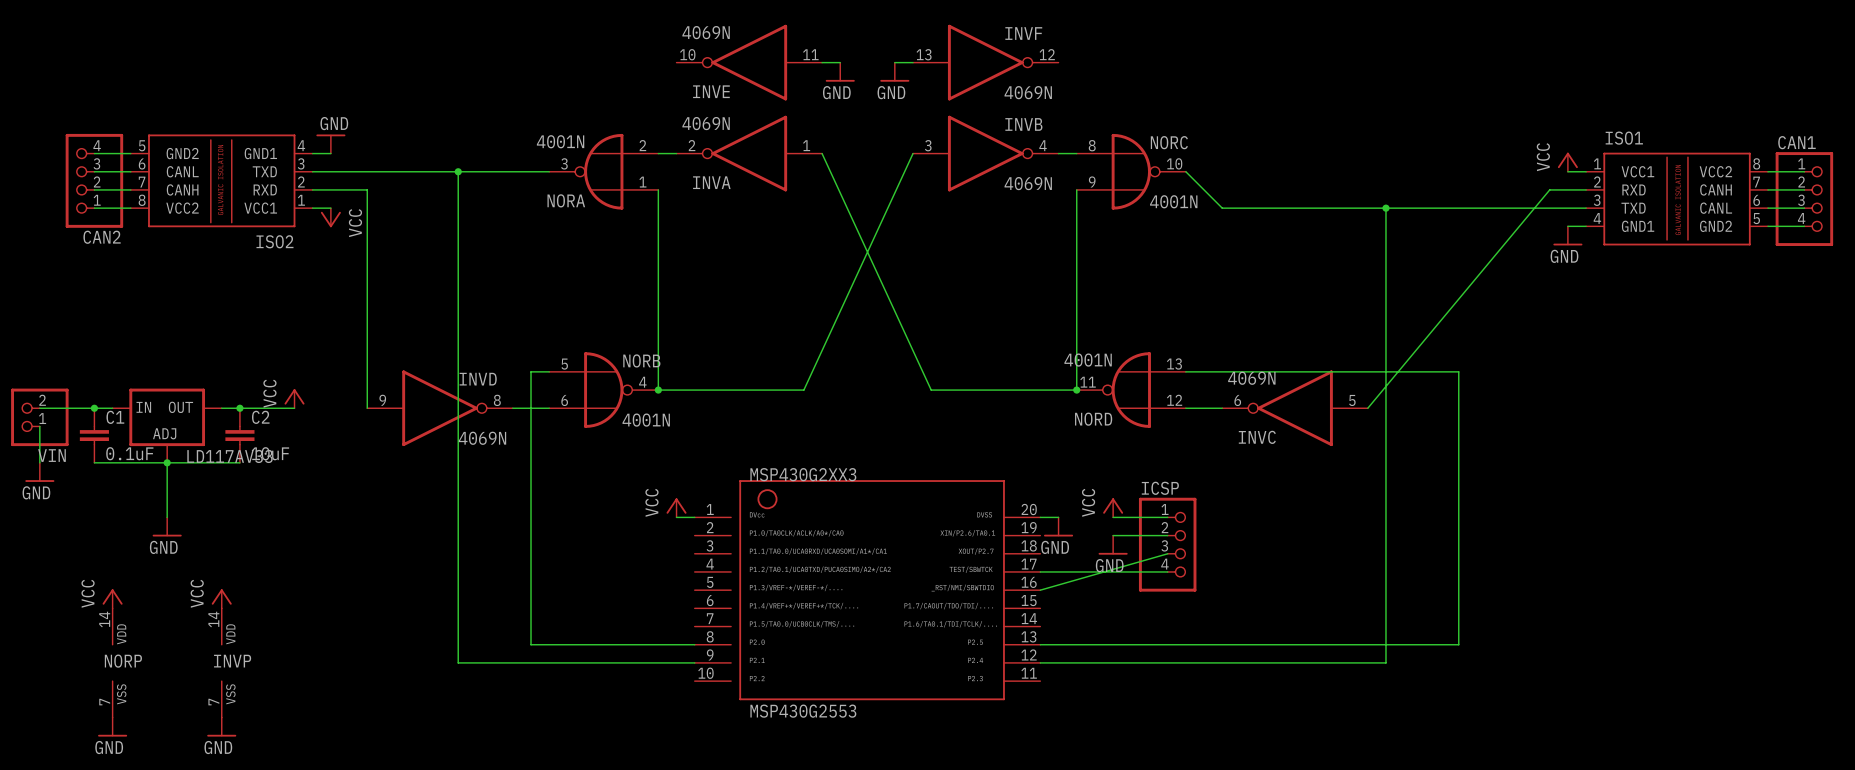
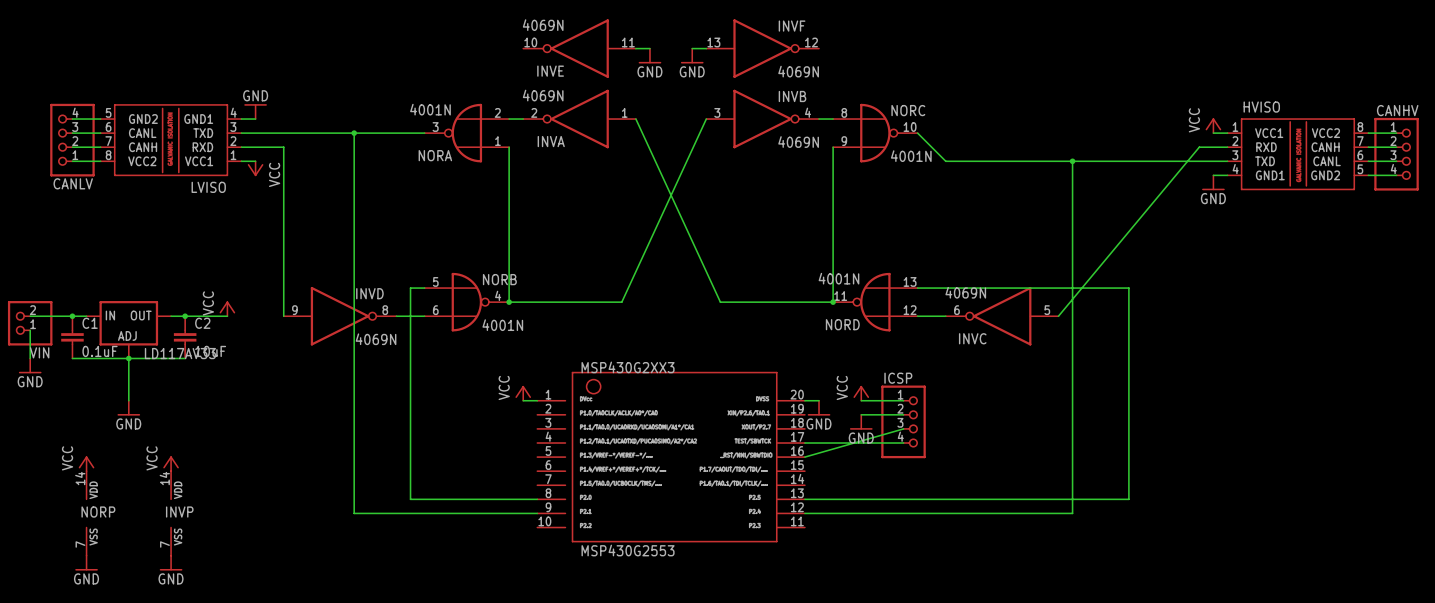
ISO1 name: ISO1 (1624, 138) -> HVISO (1261, 107)
CAN1 name: CAN1 (1796, 142) -> CANHV (1397, 110)
CAN2 name: CAN2 (102, 237) -> CANLV (73, 183)
ISO2 name: ISO2 (274, 241) -> LVISO (208, 187)

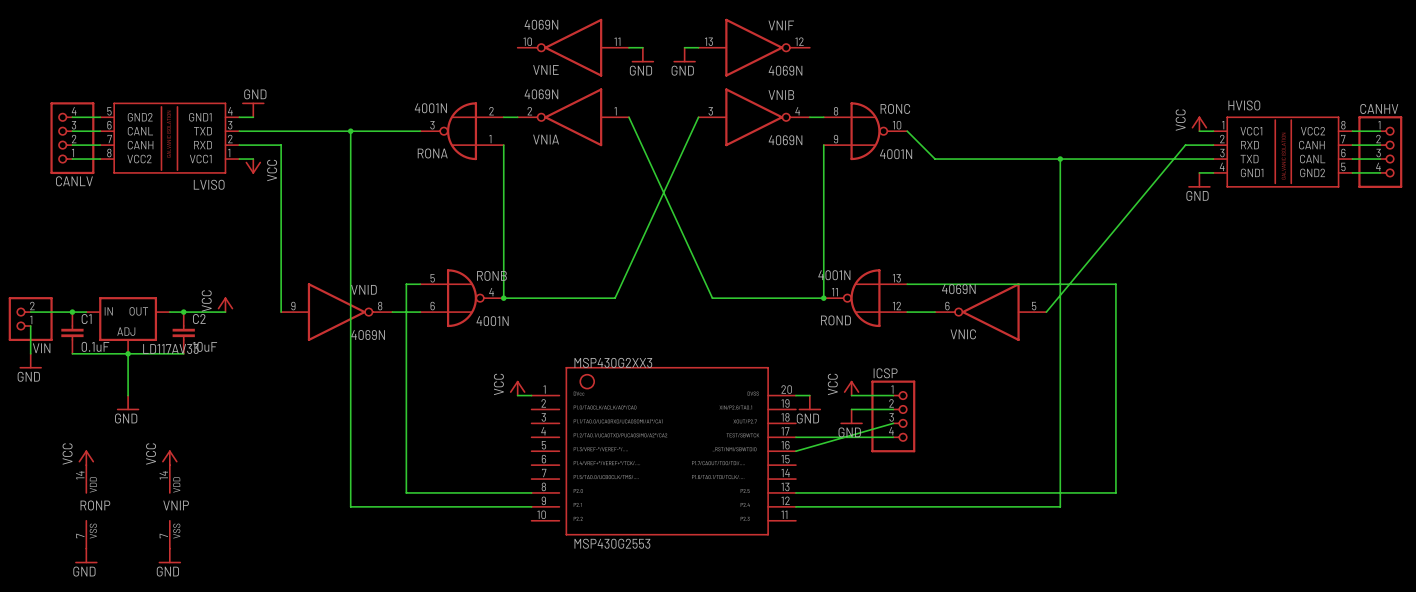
INVF name: INVF (792, 26) -> VNIF (781, 25)
INVE name: INVE (550, 71) -> VNIE (545, 69)
INVB name: INVB (792, 96) -> VNIB (781, 95)
NORC name: NORC (908, 110) -> RONC (895, 108)
INVA name: INVA (551, 141) -> VNIA (546, 139)
NORA name: NORA (435, 155) -> RONA (432, 153)
NORB name: NORB (499, 279) -> RONB (491, 275)
INVD name: INVD (369, 293) -> VNID (363, 289)
NORD name: NORD (842, 324) -> ROND (835, 320)
INVC name: INVC (972, 338) -> VNIC (963, 334)
NORP name: NORP (98, 512) -> RONP (95, 505)
INVP name: INVP (179, 512) -> VNIP (176, 505)

